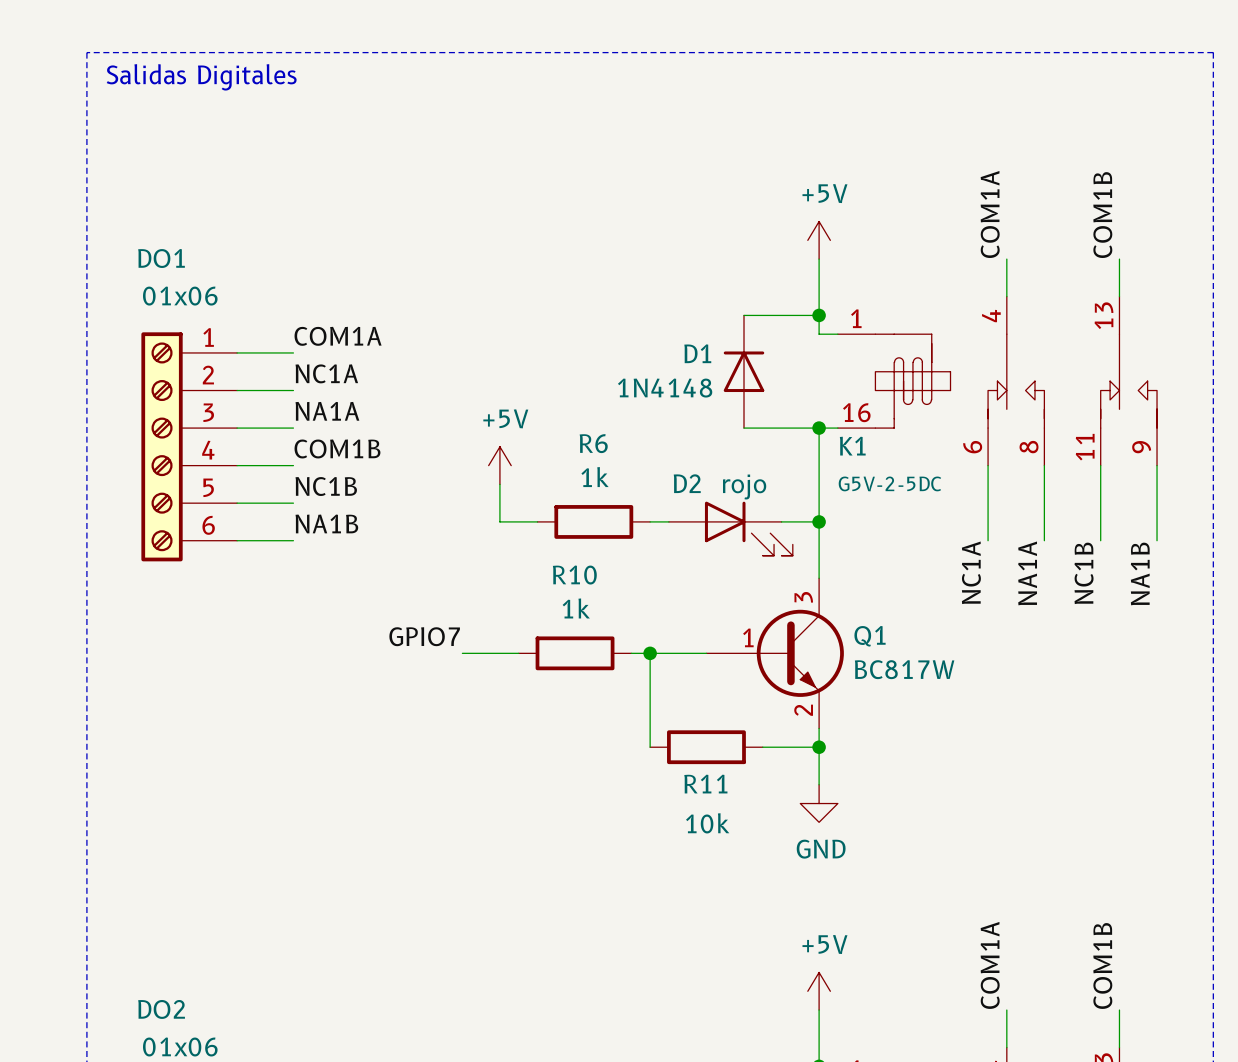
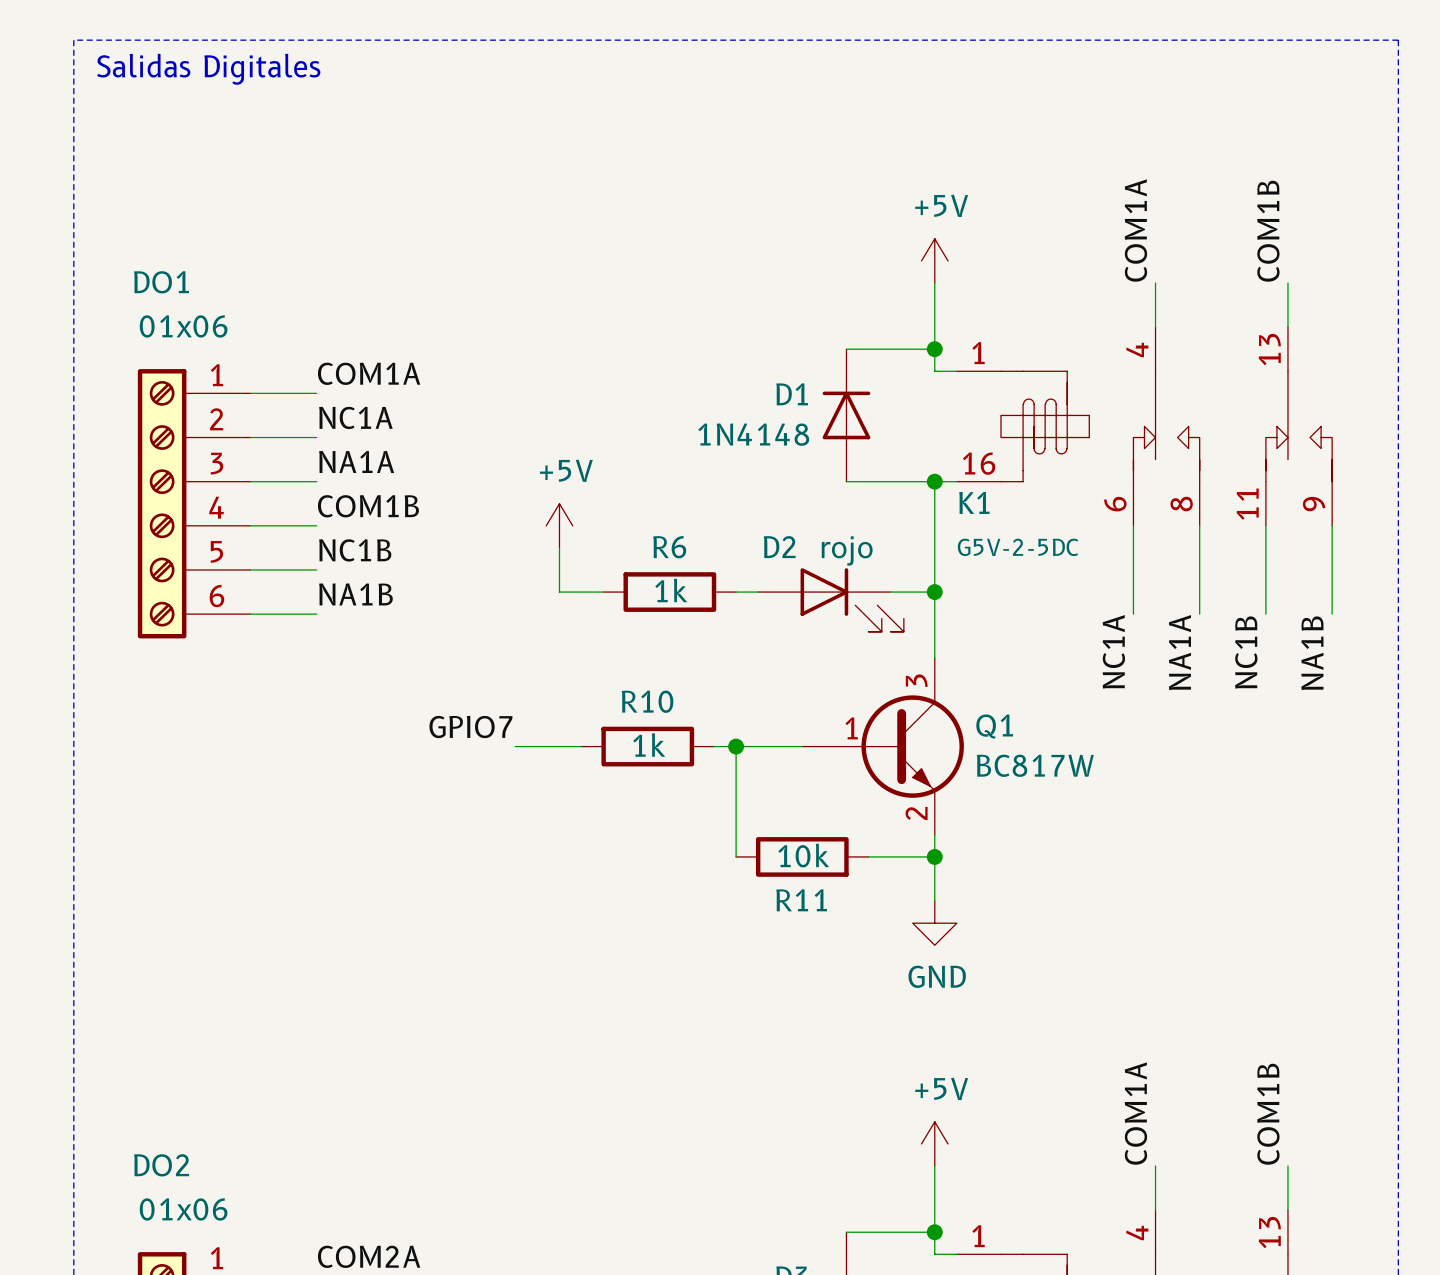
R6 name position: R6 (593, 443) -> R6 (669, 547)
R6 value position: 1k (595, 477) -> 1k (671, 590)
R10 name position: R10 (574, 575) -> R10 (647, 701)
R10 value position: 1k (576, 608) -> 1k (649, 745)
R11 value position: 10k (707, 823) -> 10k (803, 855)

